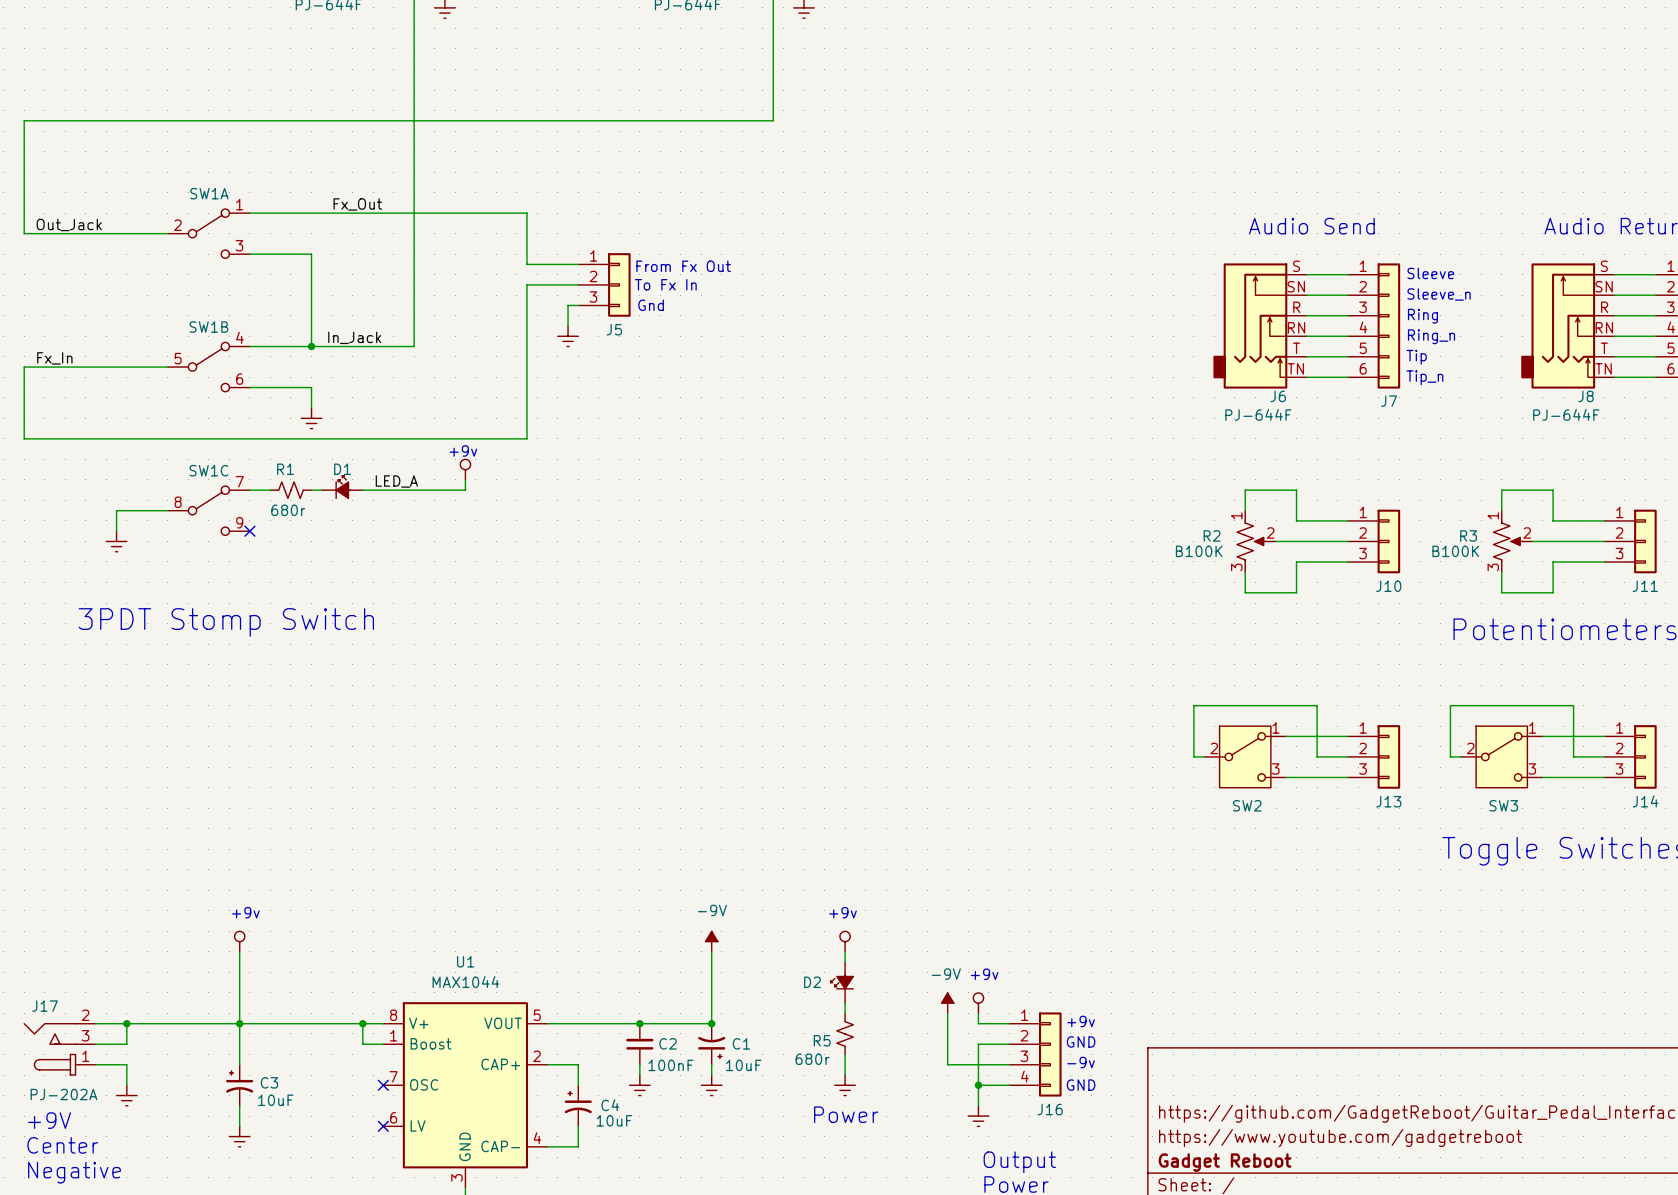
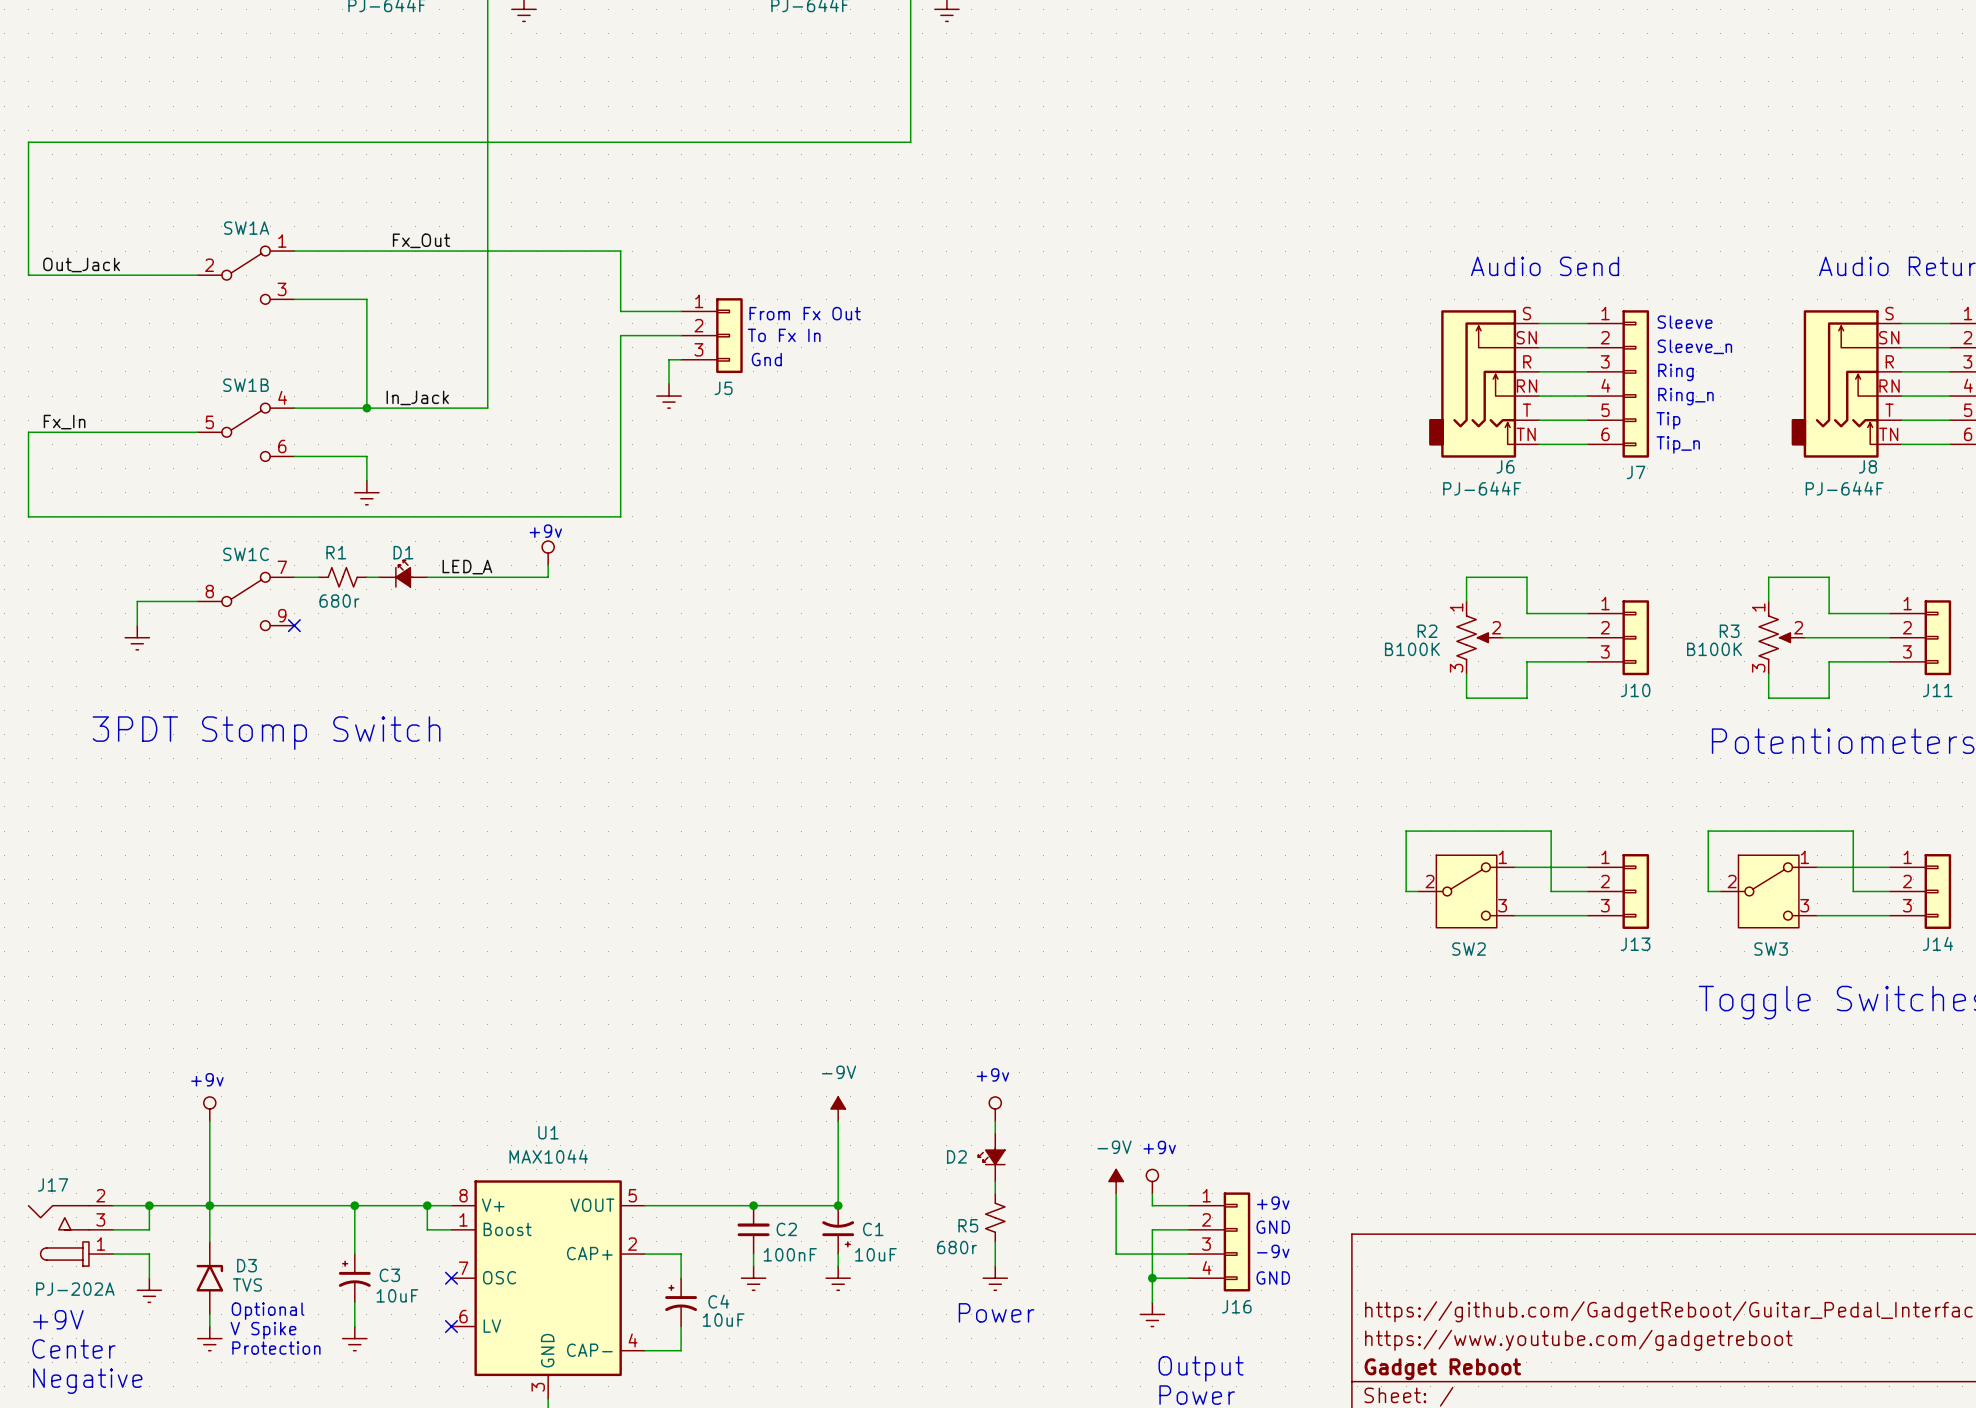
text position: +9v (245, 912) -> +9v (207, 1079)
power symbol position: (239, 941) -> (209, 1109)
wire: none -> (209, 1121) (209, 1241)
wire: (239, 951) (239, 1064) -> none
junction: none -> (209, 1205)
junction: (239, 1023) -> none
wire: none -> (354, 1205) (354, 1254)
junction: none -> (354, 1205)
D3: none -> TVS (209, 1278)
C3 position: (239, 1085) -> (354, 1278)
wire: (239, 1105) (239, 1126) -> (354, 1302) (354, 1326)
text: none -> Optional (268, 1311)
wire: none -> (209, 1314) (209, 1326)
text: none -> V Spike (263, 1330)
power symbol: none -> (209, 1338)
power symbol: (239, 1136) -> none
power symbol: none -> (354, 1338)
text: none -> Protection (276, 1348)

